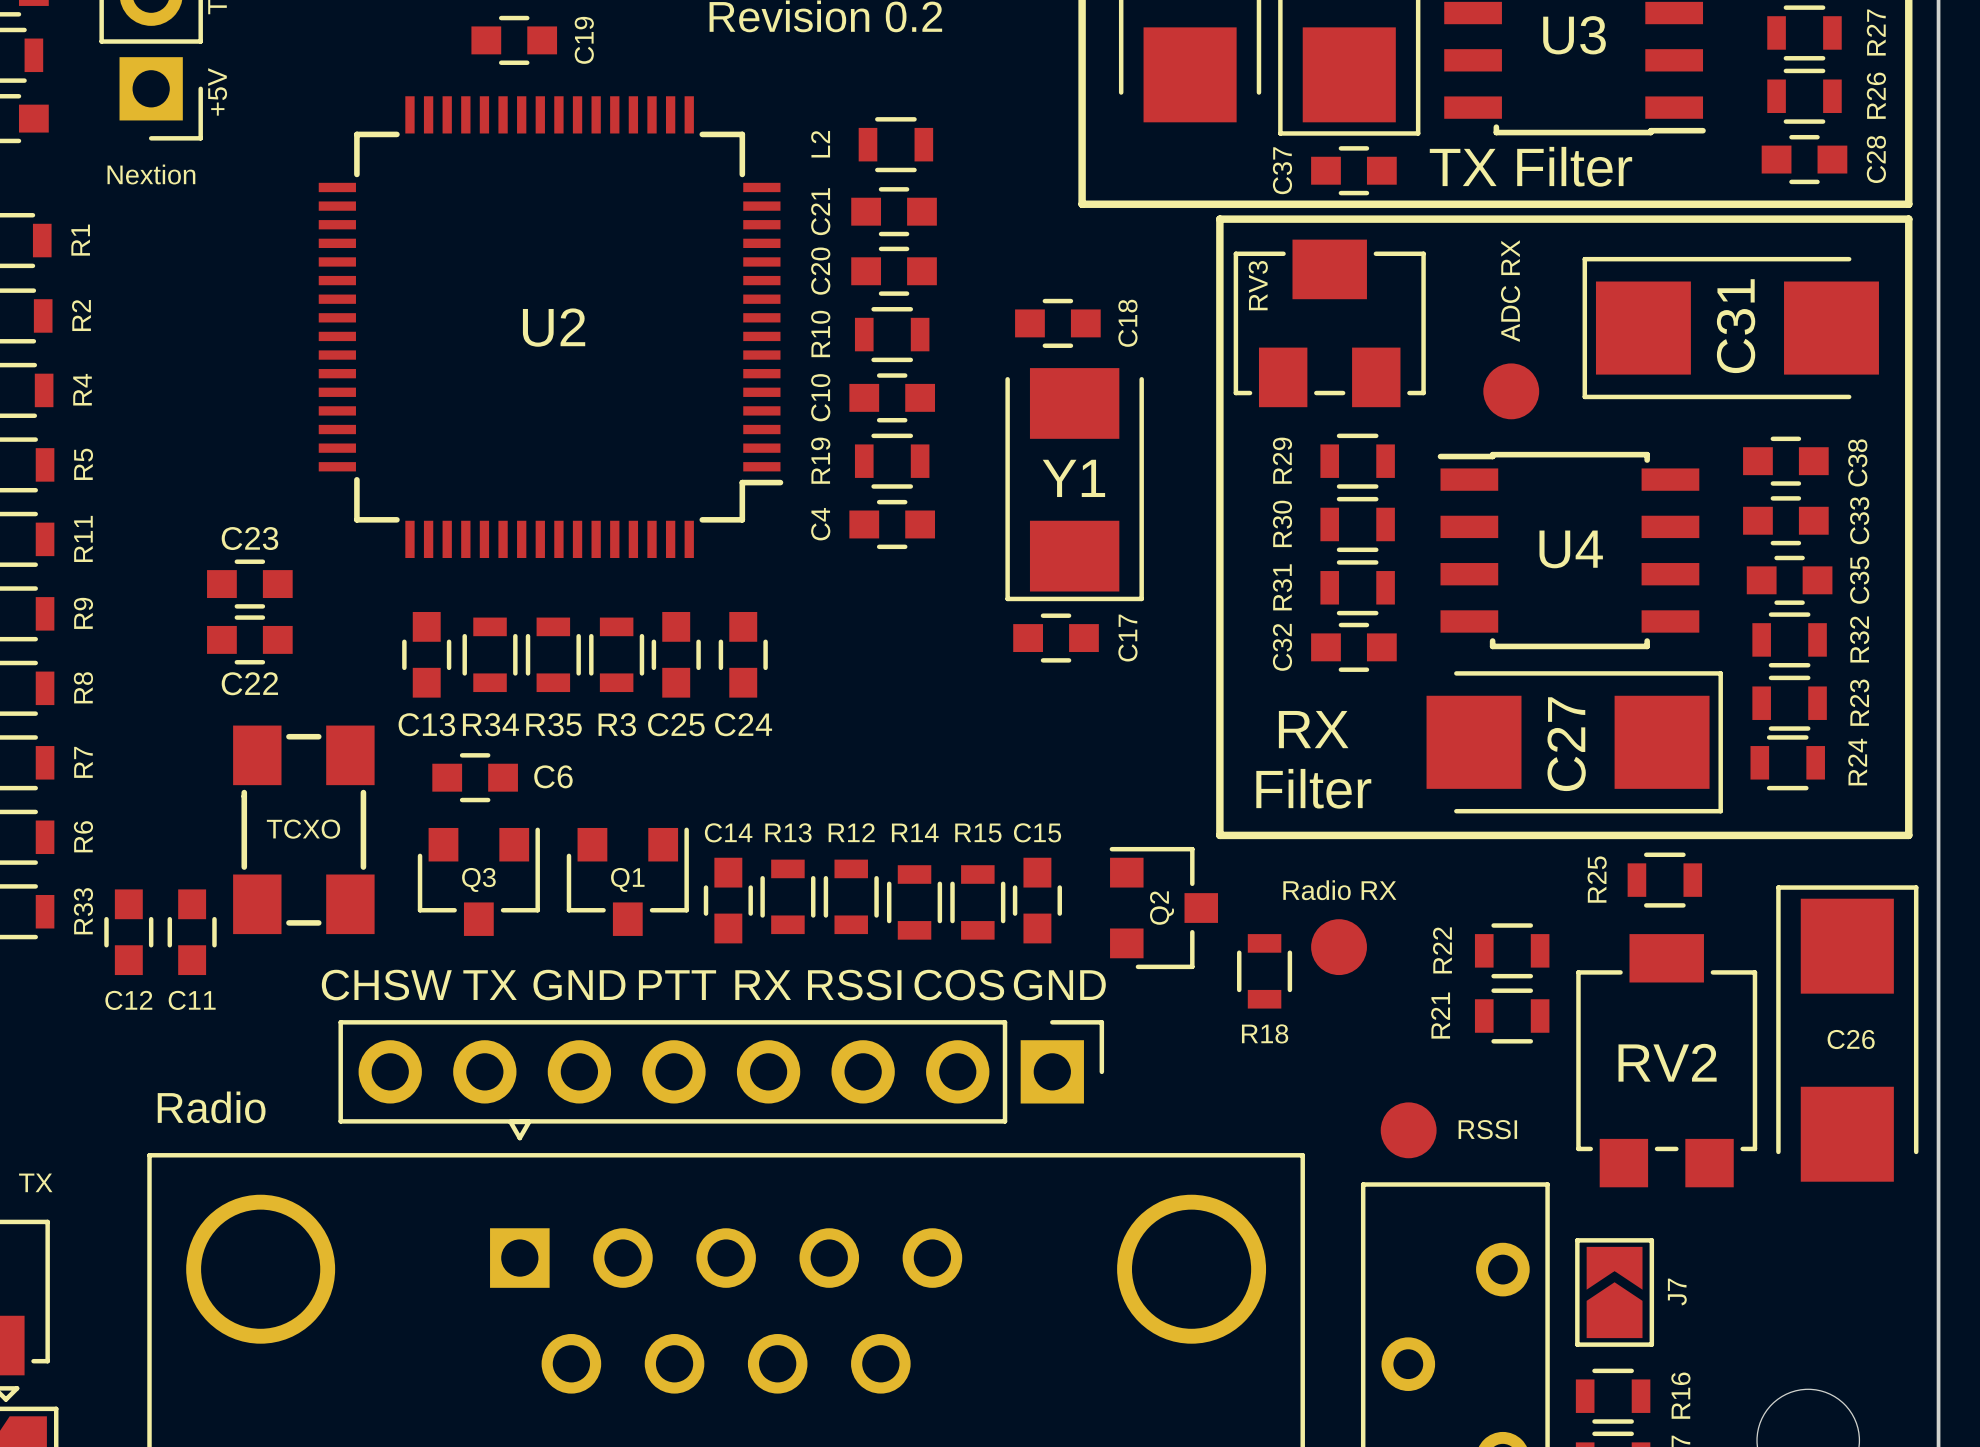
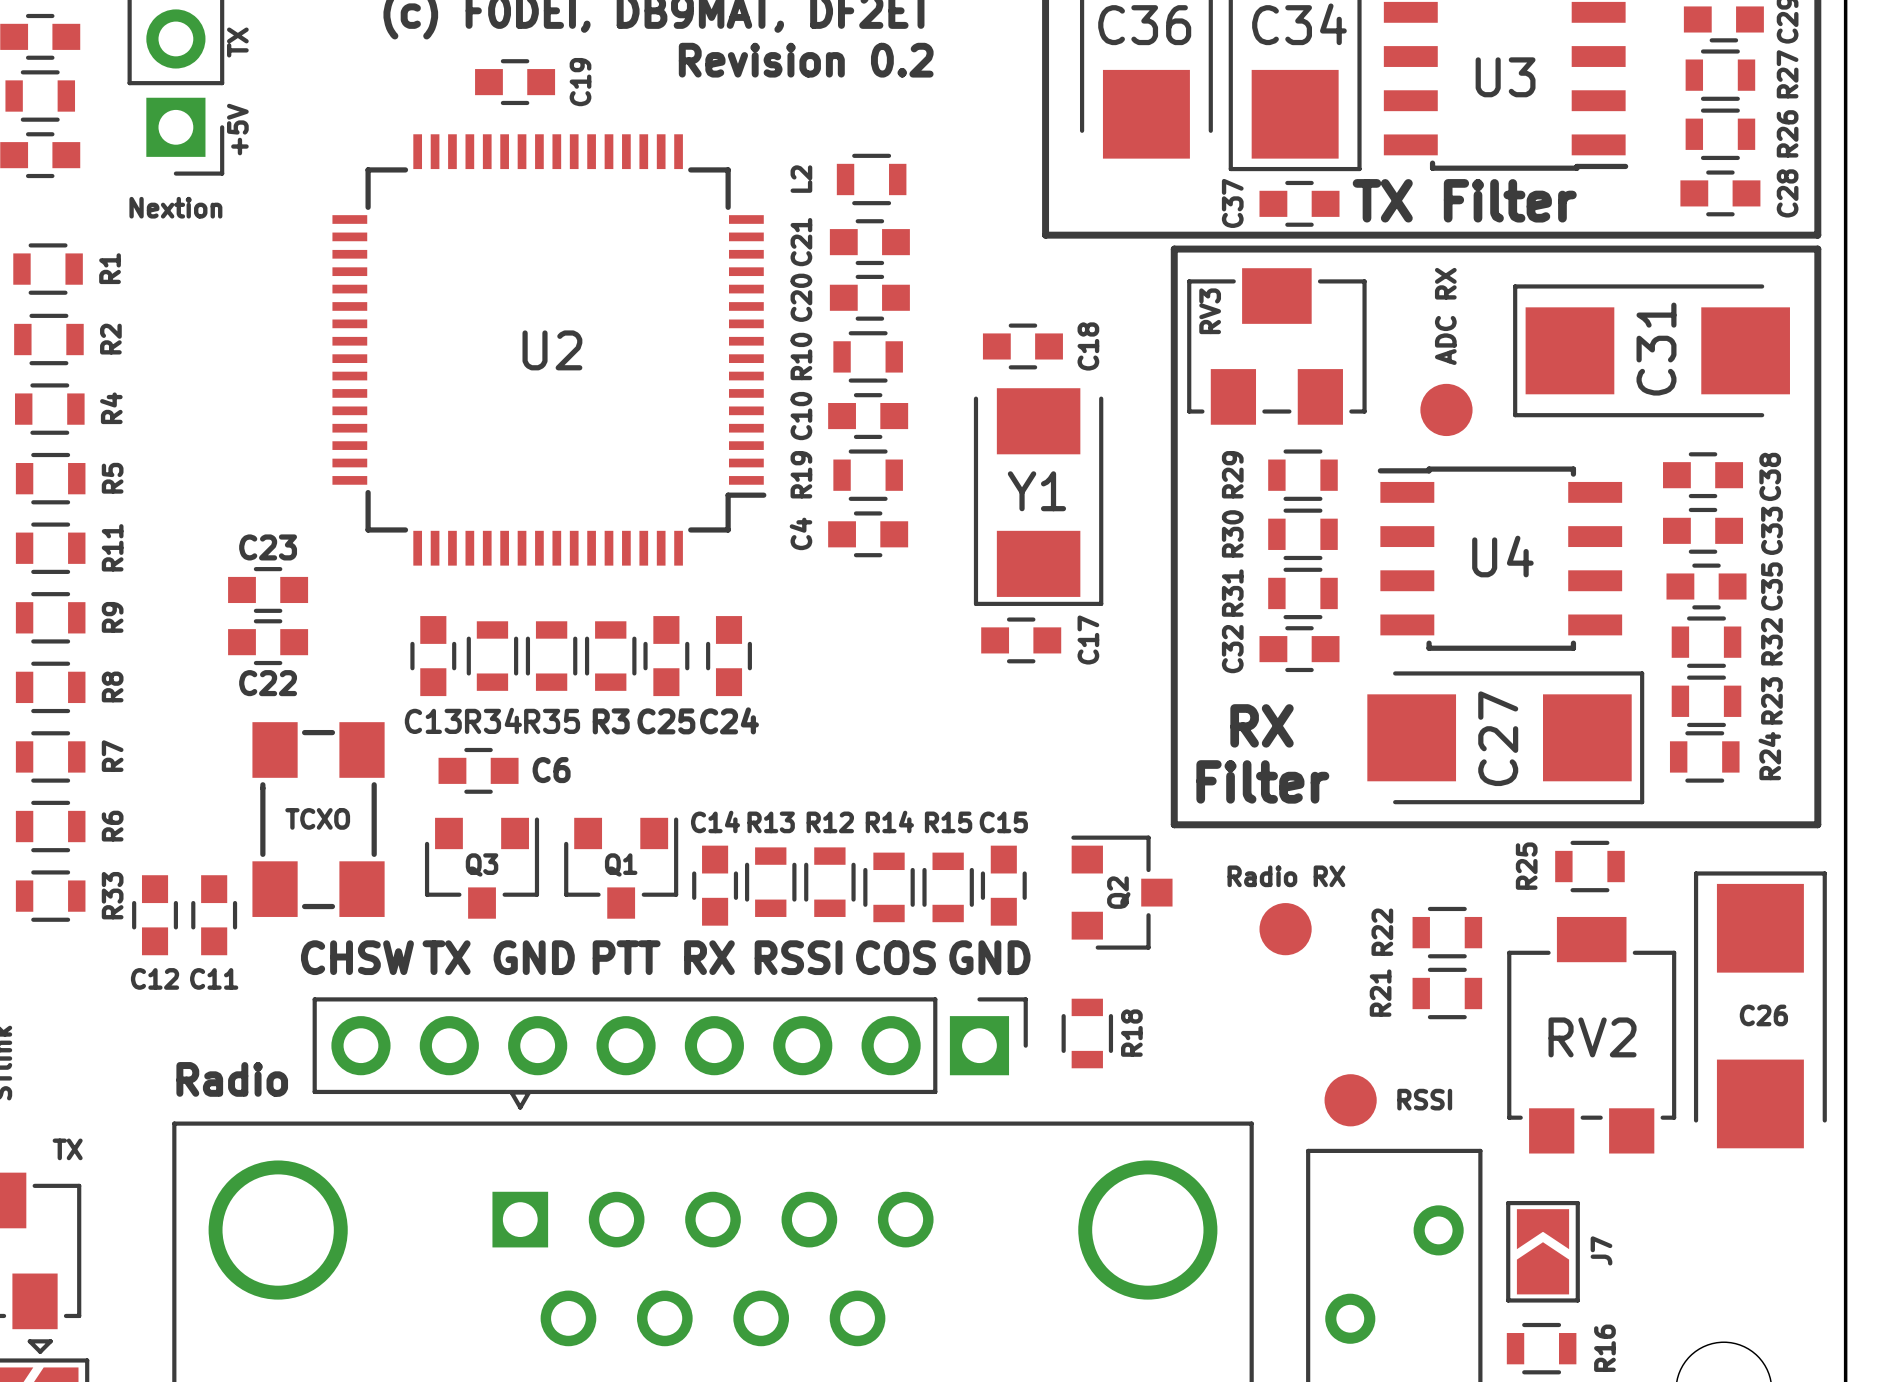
R18 position: (1264, 971) -> (1087, 1033)
text position: CHSW (386, 985) -> CHSW (357, 957)
text position: TX (490, 985) -> TX (446, 957)
text position: GND (579, 985) -> GND (534, 957)
text position: PTT (677, 985) -> PTT (626, 957)
text position: RX (763, 985) -> RX (709, 957)
text position: RSSI (854, 985) -> RSSI (798, 957)
text position: COS (959, 985) -> COS (895, 957)
text position: GND (1059, 985) -> GND (989, 957)
R18 name rotation: 0° (1265, 1033) -> 90° counterclockwise (1131, 1033)
R18 name position: R18 (1265, 1033) -> R18 (1131, 1033)
part position: (721, 1071) -> (670, 1045)

